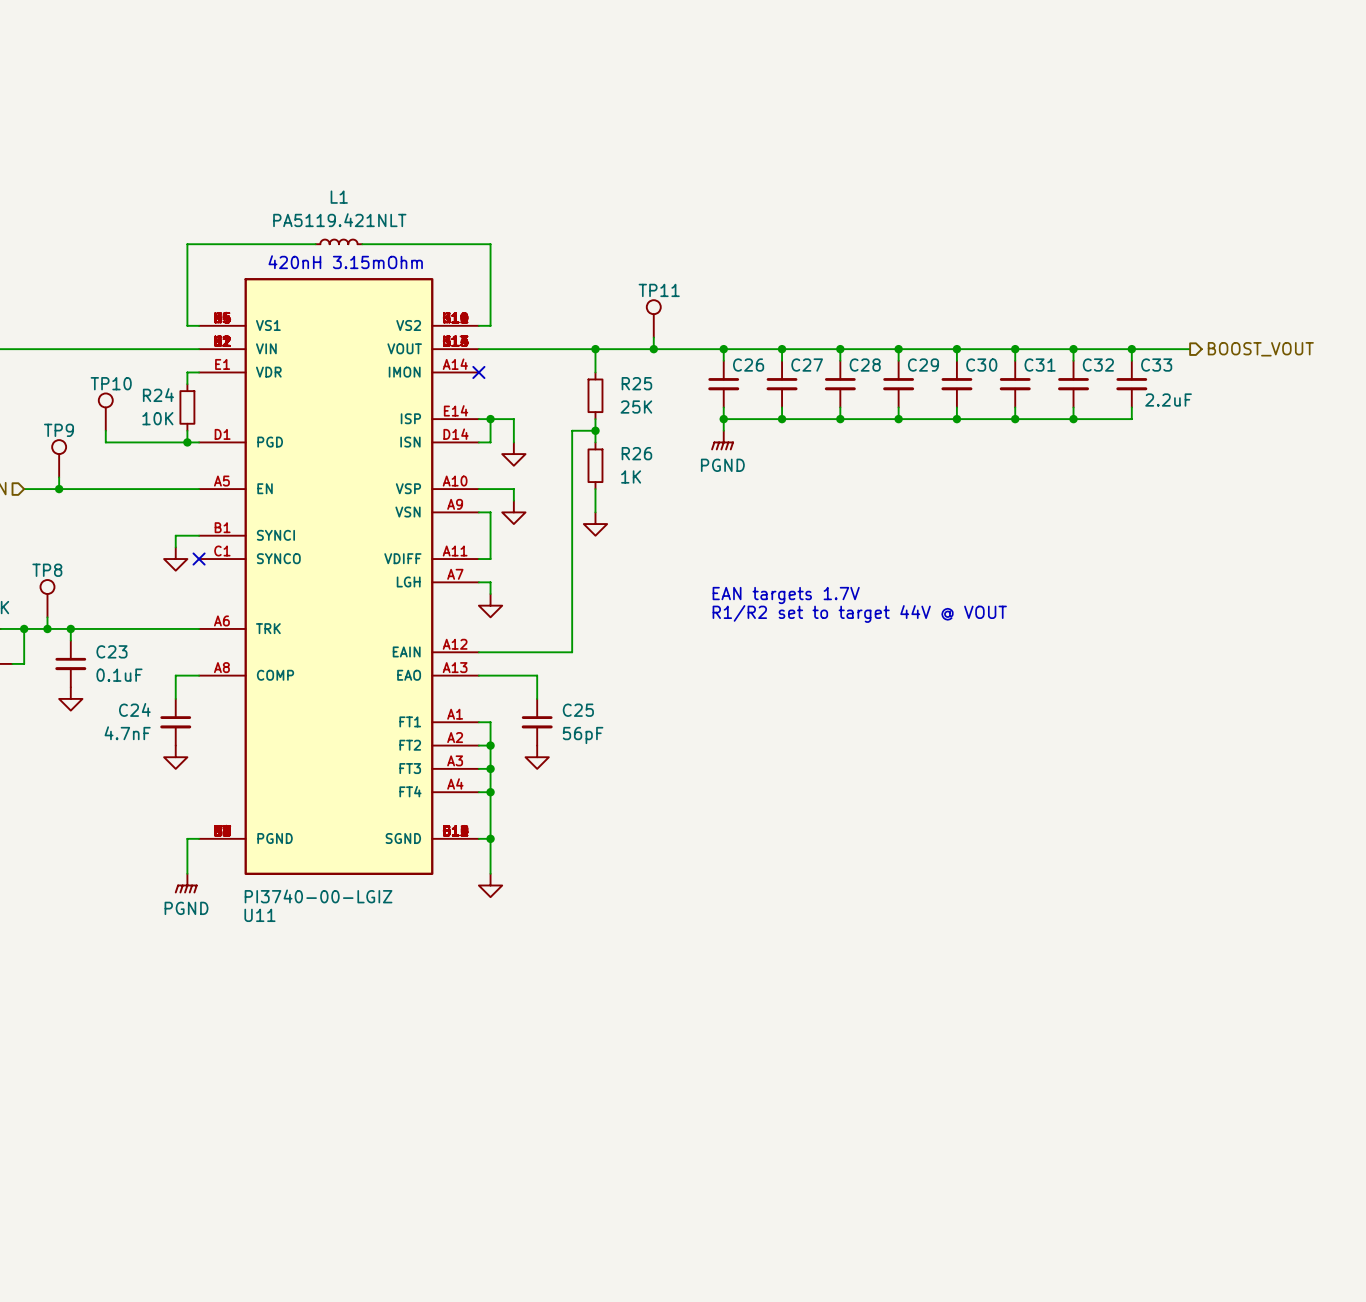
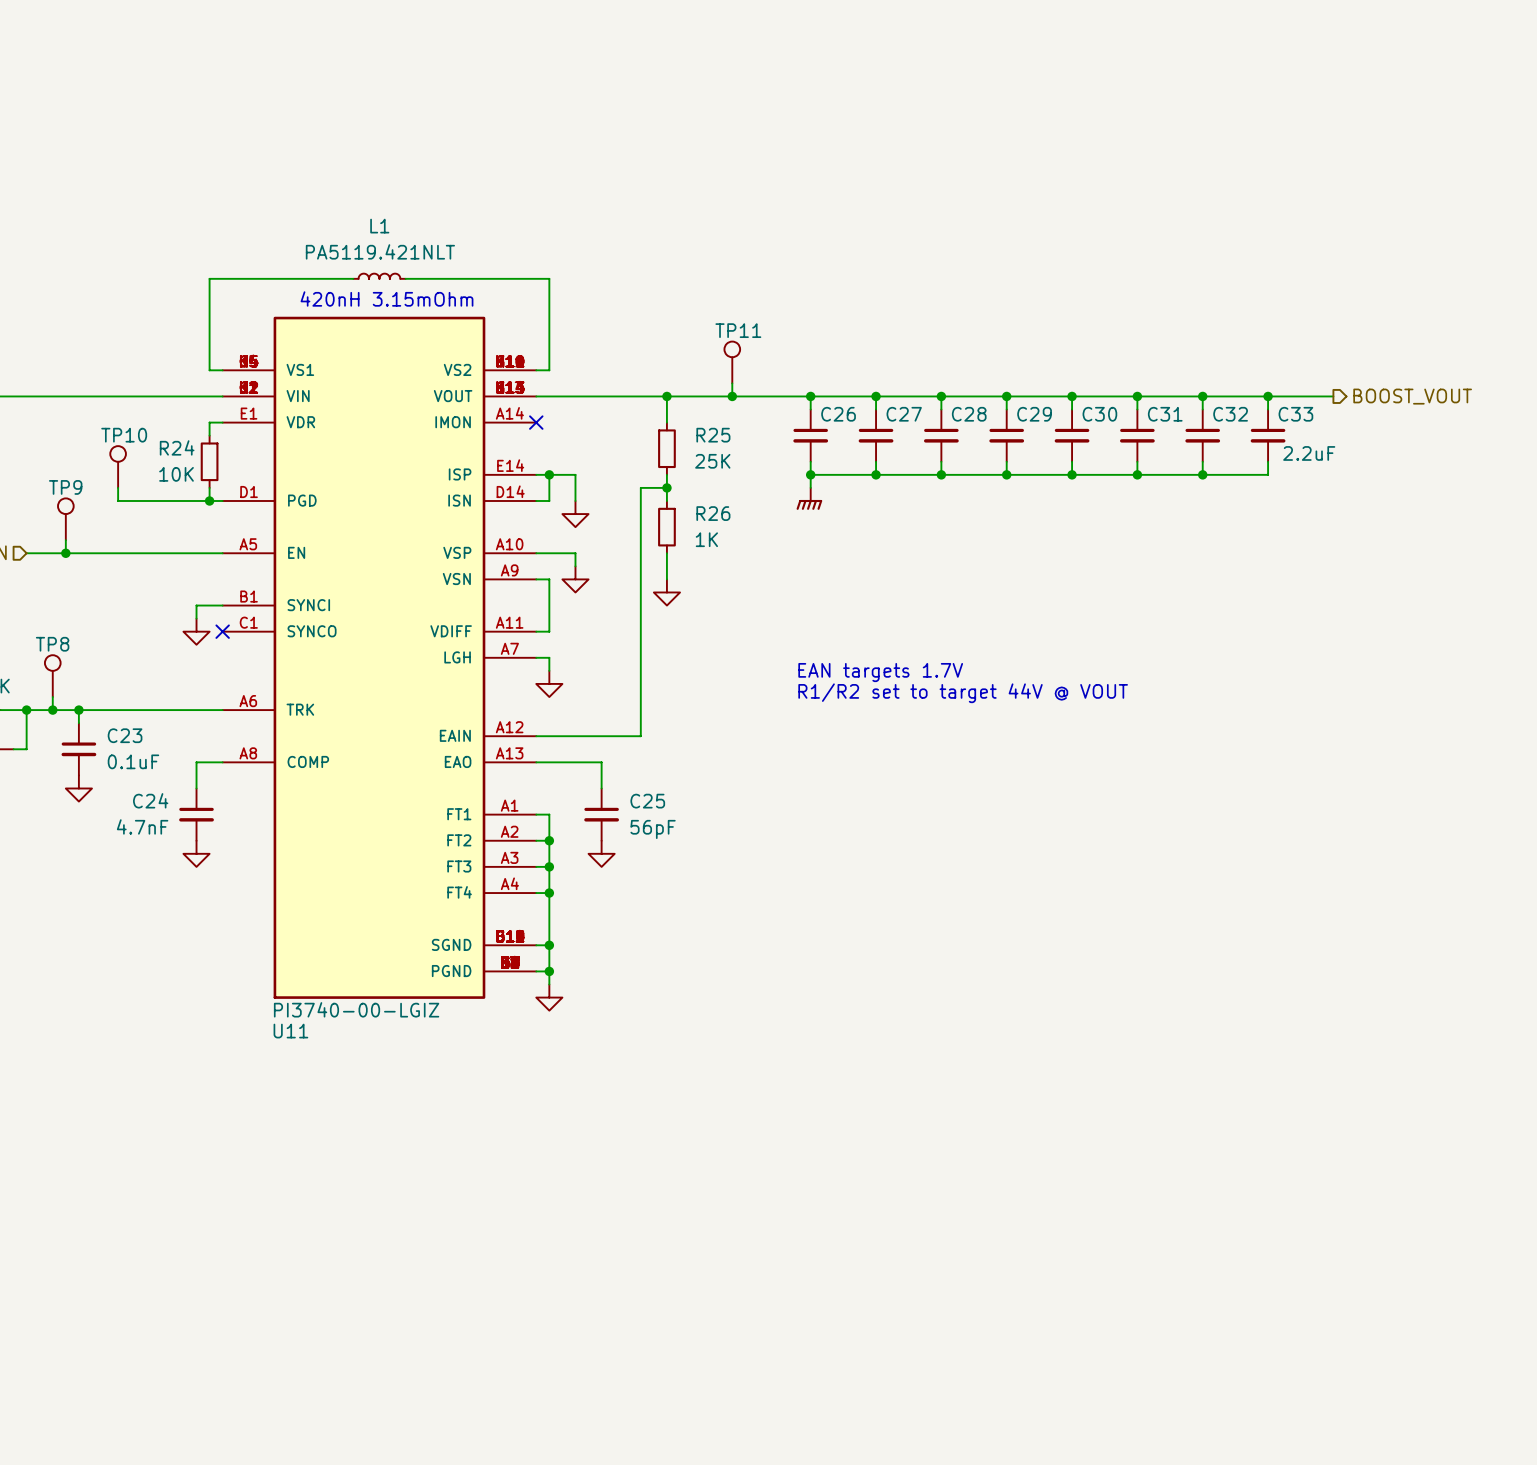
U11 symbol: [199, 278, 479, 875] -> [222, 316, 537, 999]
power symbol text: PGND (722, 465) -> none
wire: (199, 838) (187, 838) (187, 873) -> none
wire: none -> (536, 971) (549, 971)
junction: none -> (549, 971)
power symbol: PGND (186, 883) -> none

